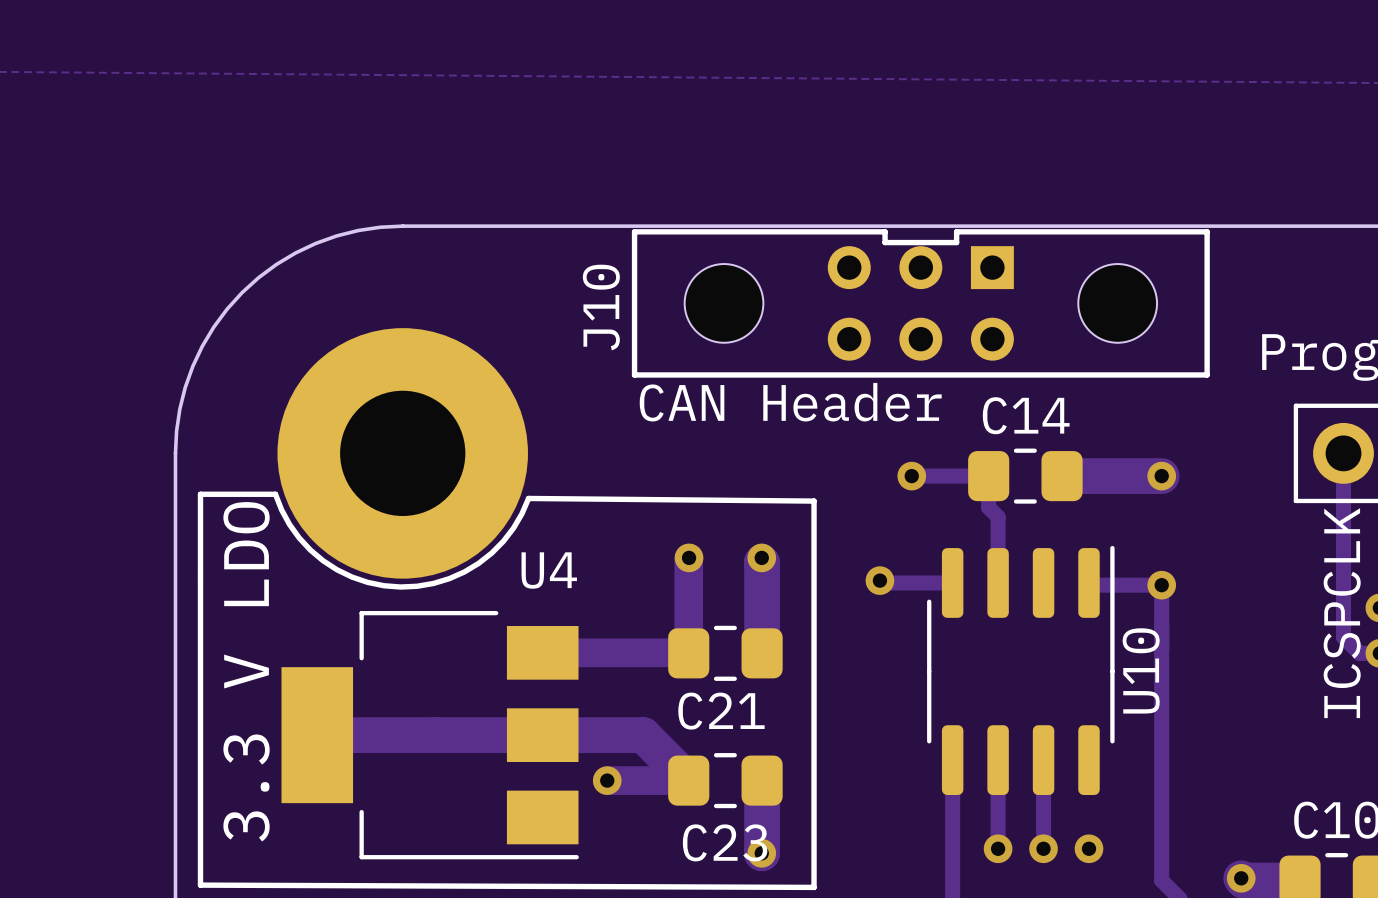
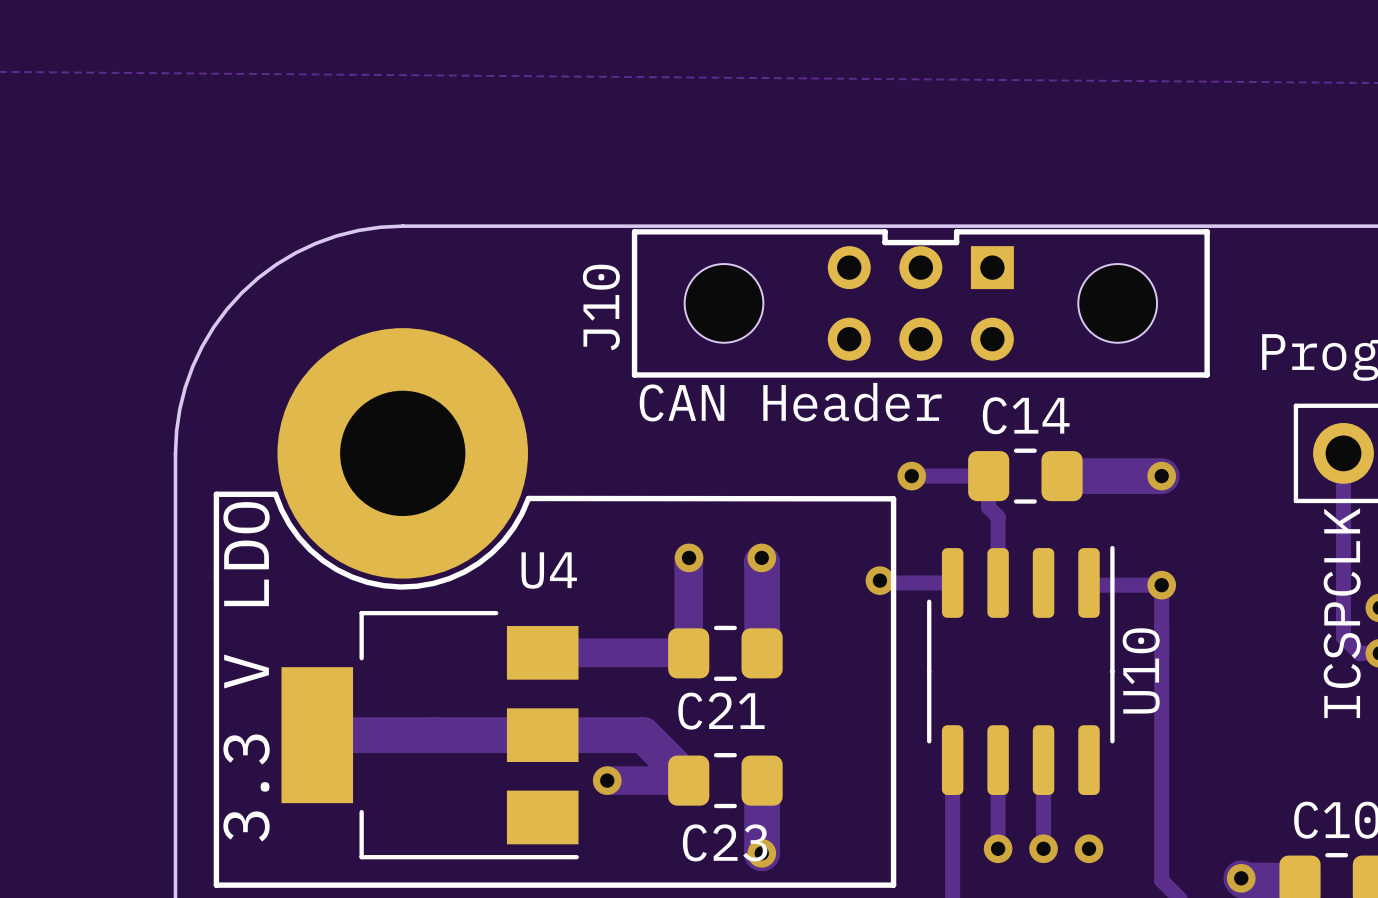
line: (216, 494) (200, 494) (200, 885) (814, 887) (814, 501) (528, 498) -> (216, 494) (216, 885) (893, 885) (893, 498) (528, 498)

